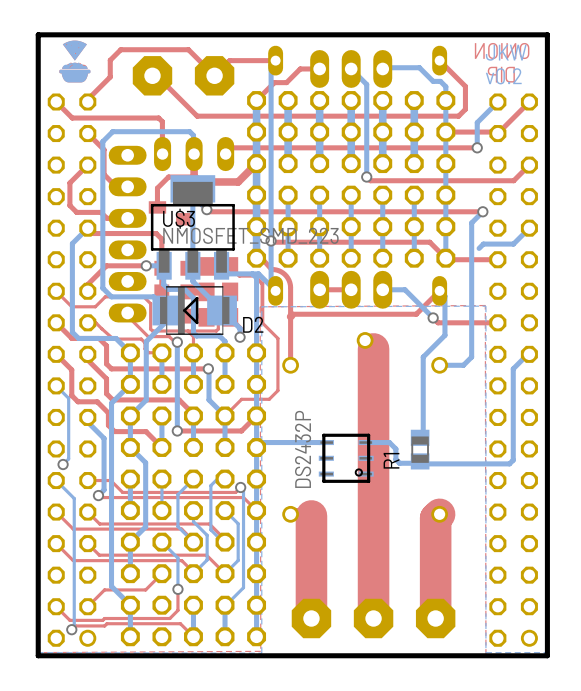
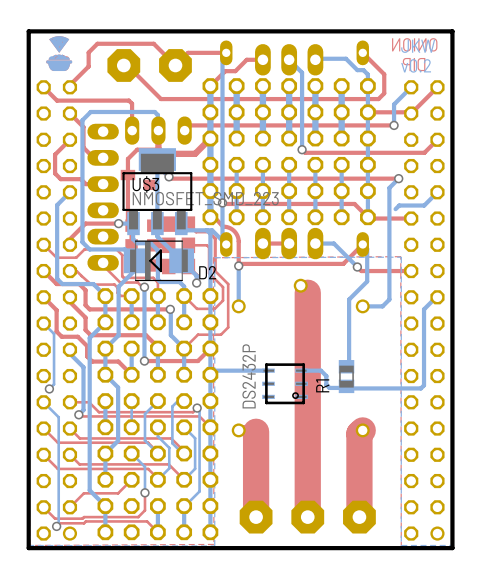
top track: (87, 228) (93, 233) (156, 233) (161, 239) (161, 268) -> (127, 175) (127, 222) (131, 225)
top track: (230, 291) (218, 303) (218, 329) (216, 331) (187, 331) -> (188, 245) (207, 245) (209, 247) (209, 273) (223, 287) (223, 300) (214, 308) (196, 308) (184, 296)
bottom track: none -> (238, 265) (238, 306)
top track: (290, 316) (290, 365) -> none
via: none -> (238, 265)

